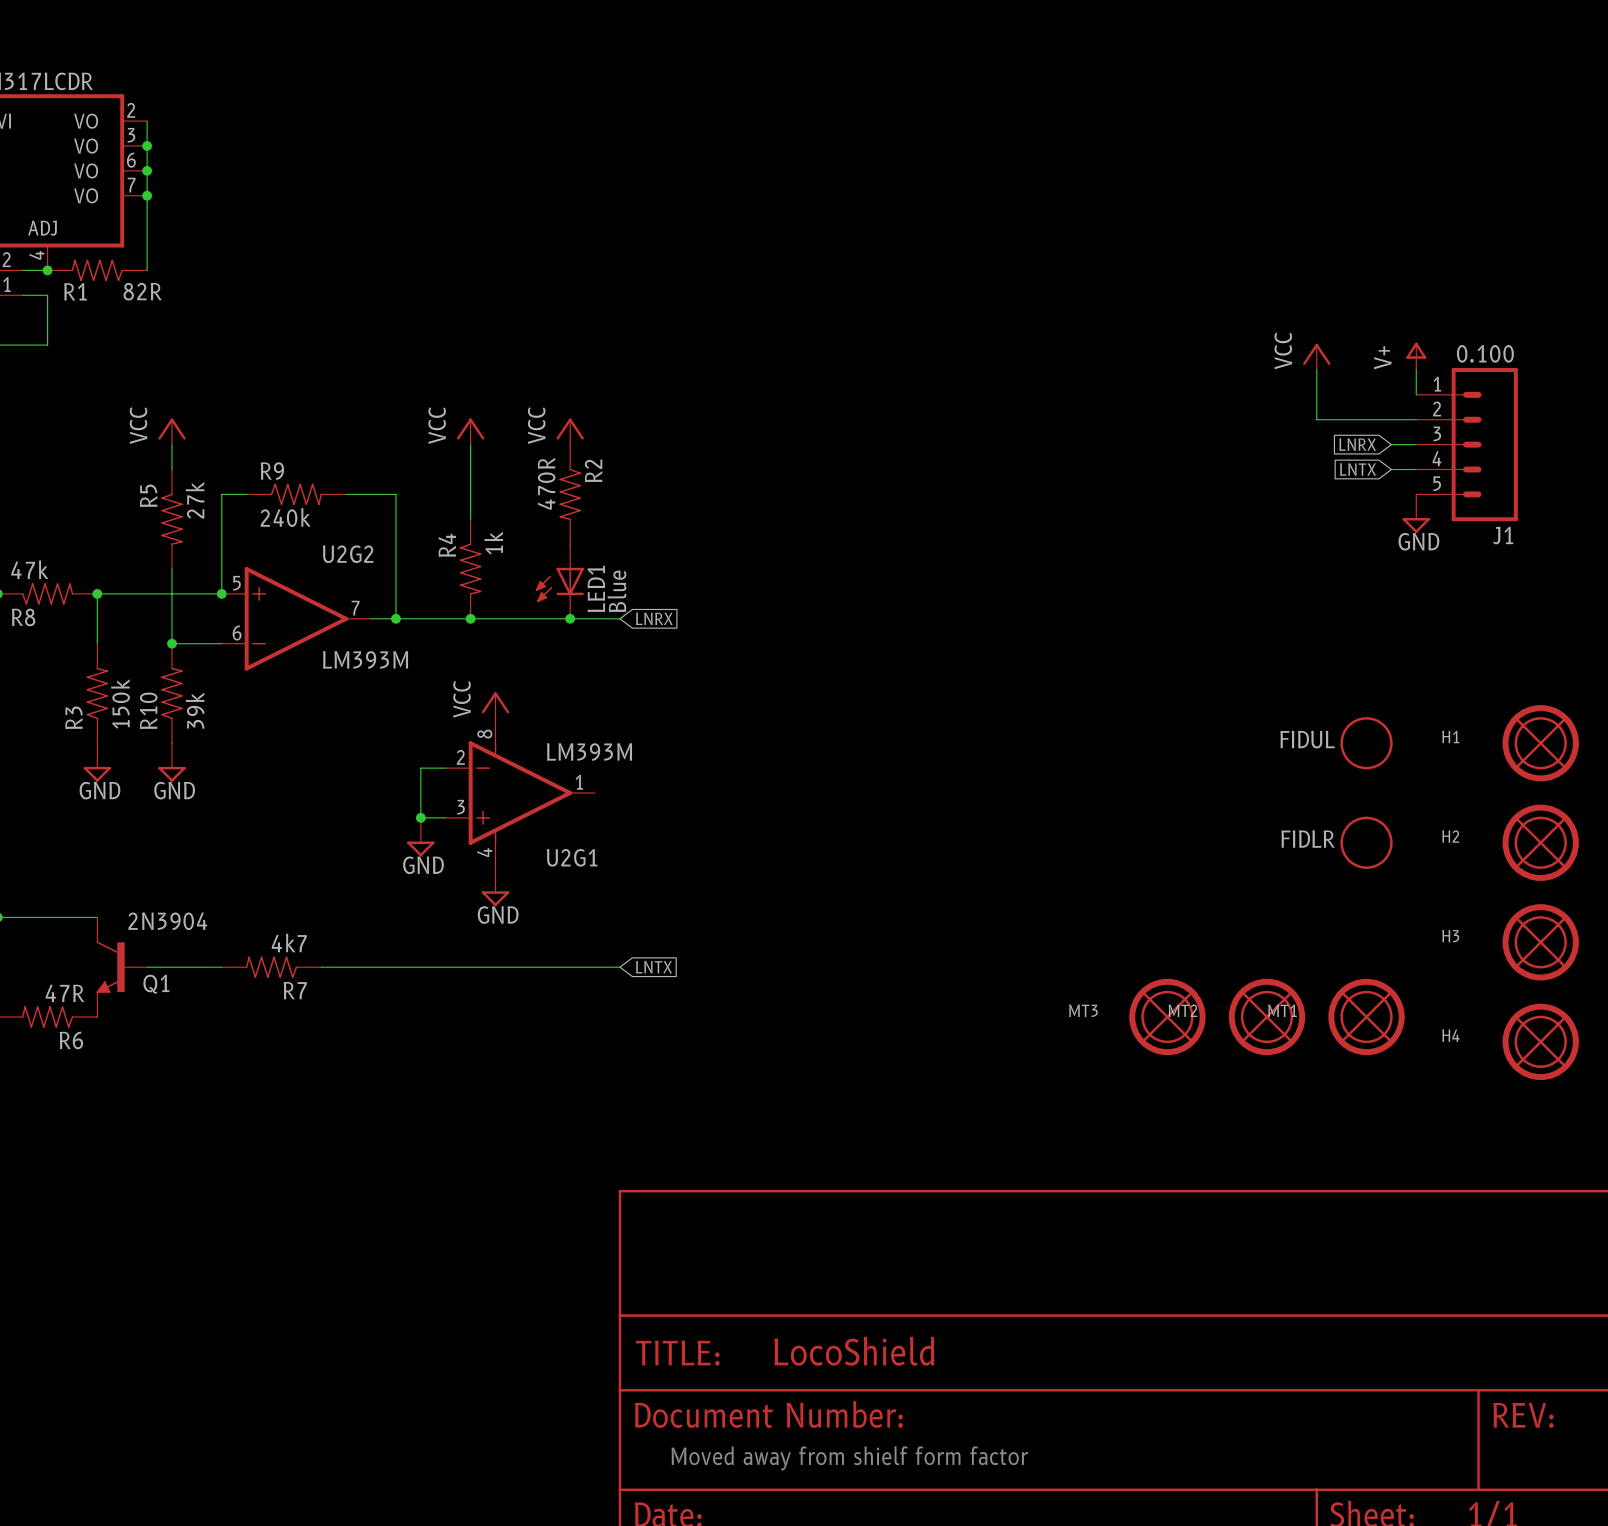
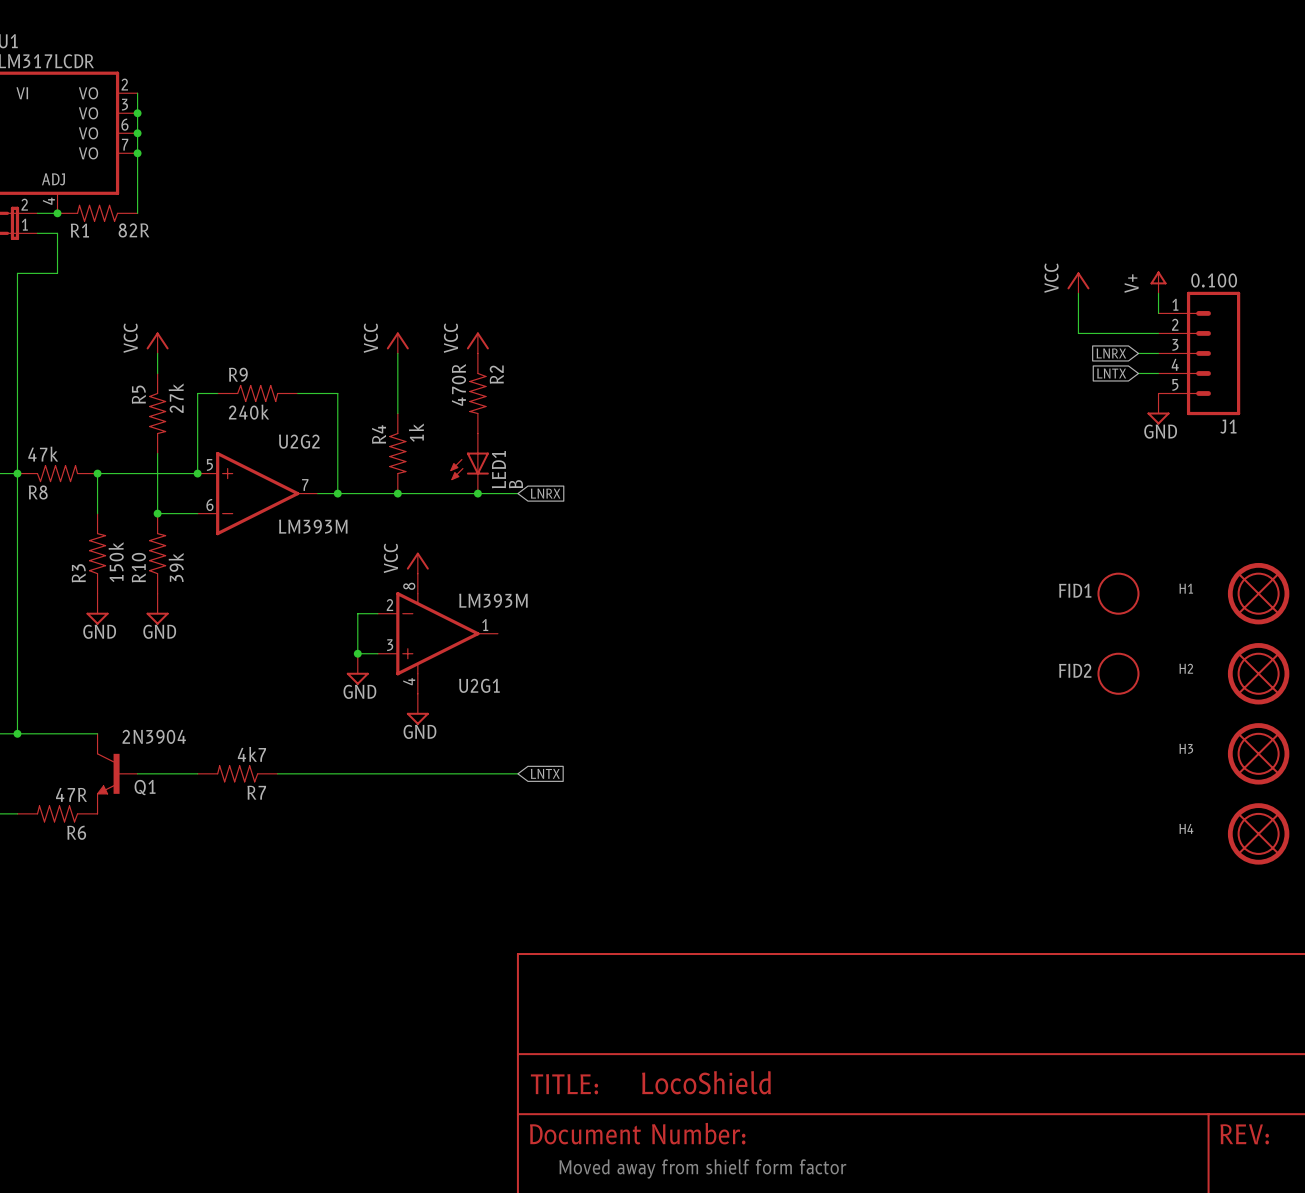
LED1 value: Blue (616, 591) -> B (515, 484)
FIDUL name: FIDUL (1307, 739) -> FID1 (1075, 590)
FIDLR name: FIDLR (1308, 839) -> FID2 (1075, 670)
MT3: (1167, 1016) -> none
MT2: (1266, 1016) -> none
MT1: (1366, 1016) -> none

